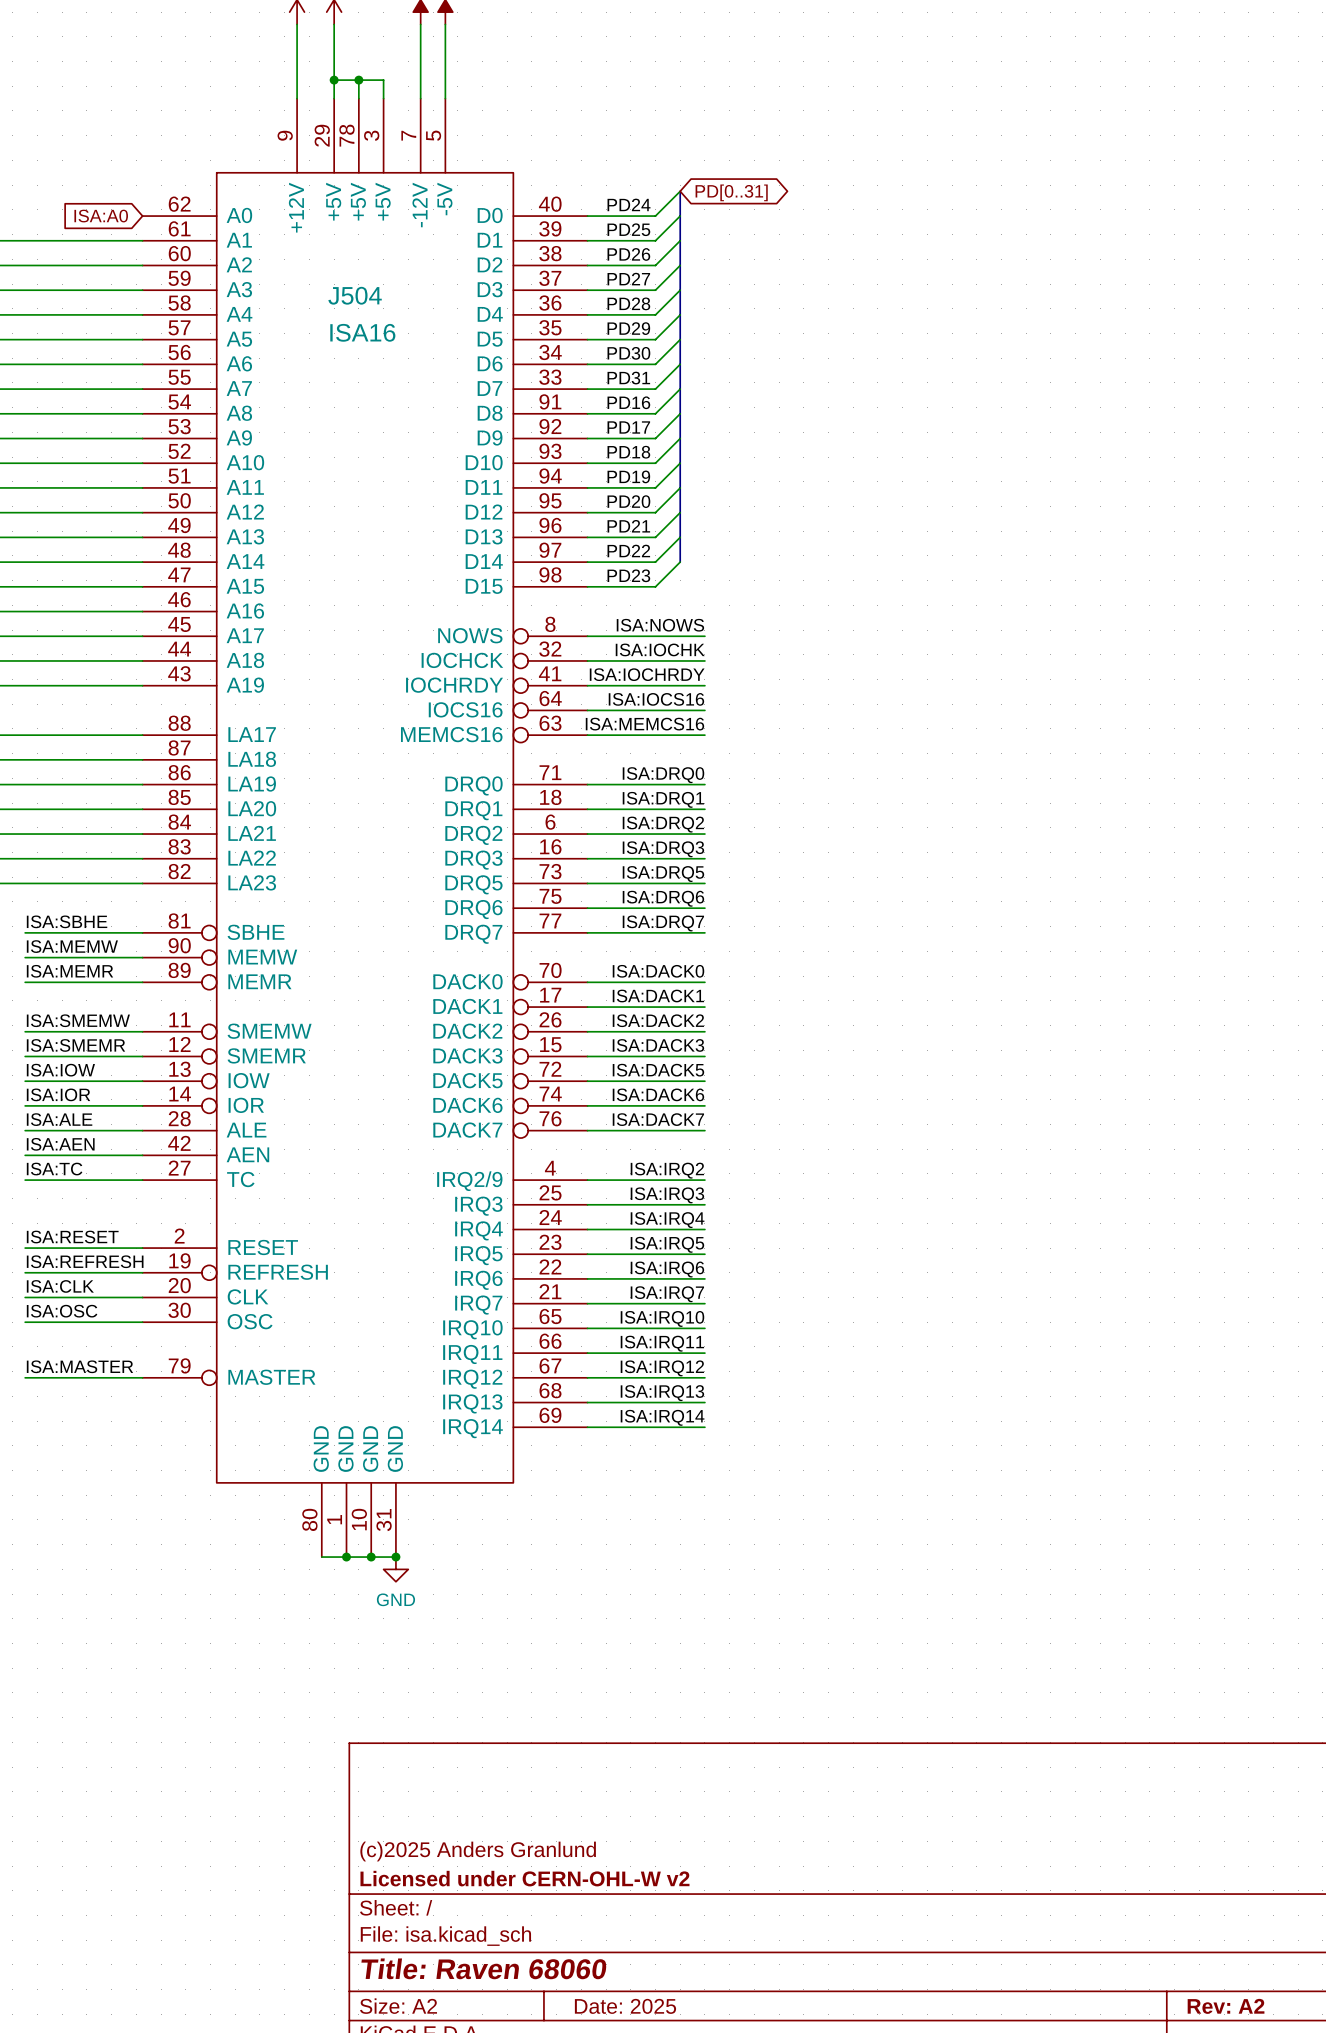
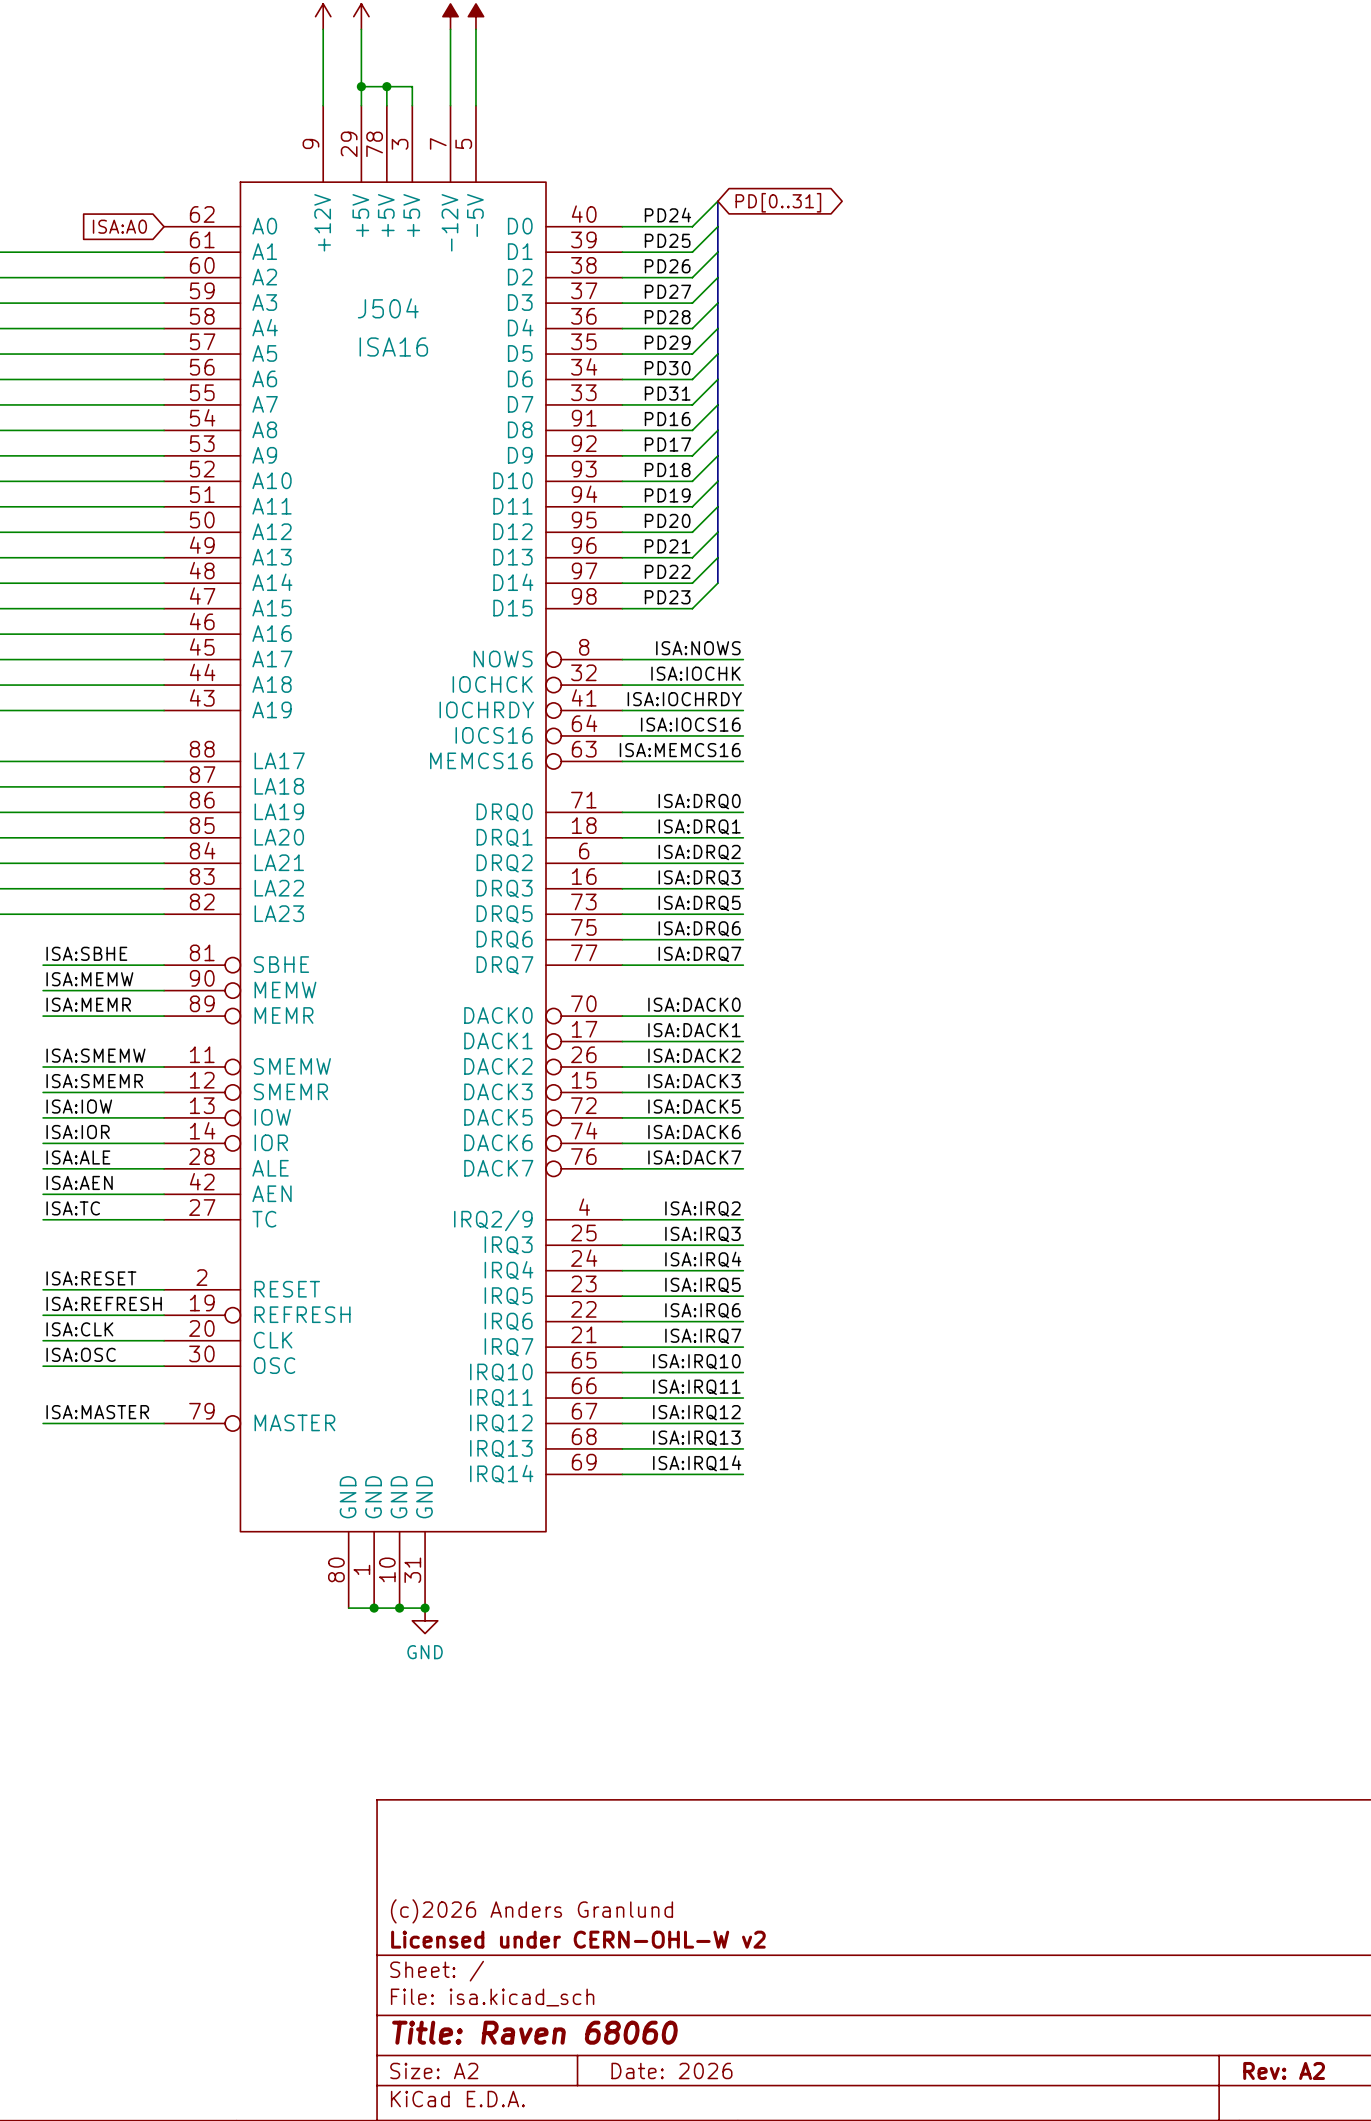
title block: (c)2025 Anders Granlund (478, 1851) -> (c)2026 Anders Granlund (531, 1911)
title block: Date: 2025 (625, 2006) -> Date: 2026 (671, 2070)

